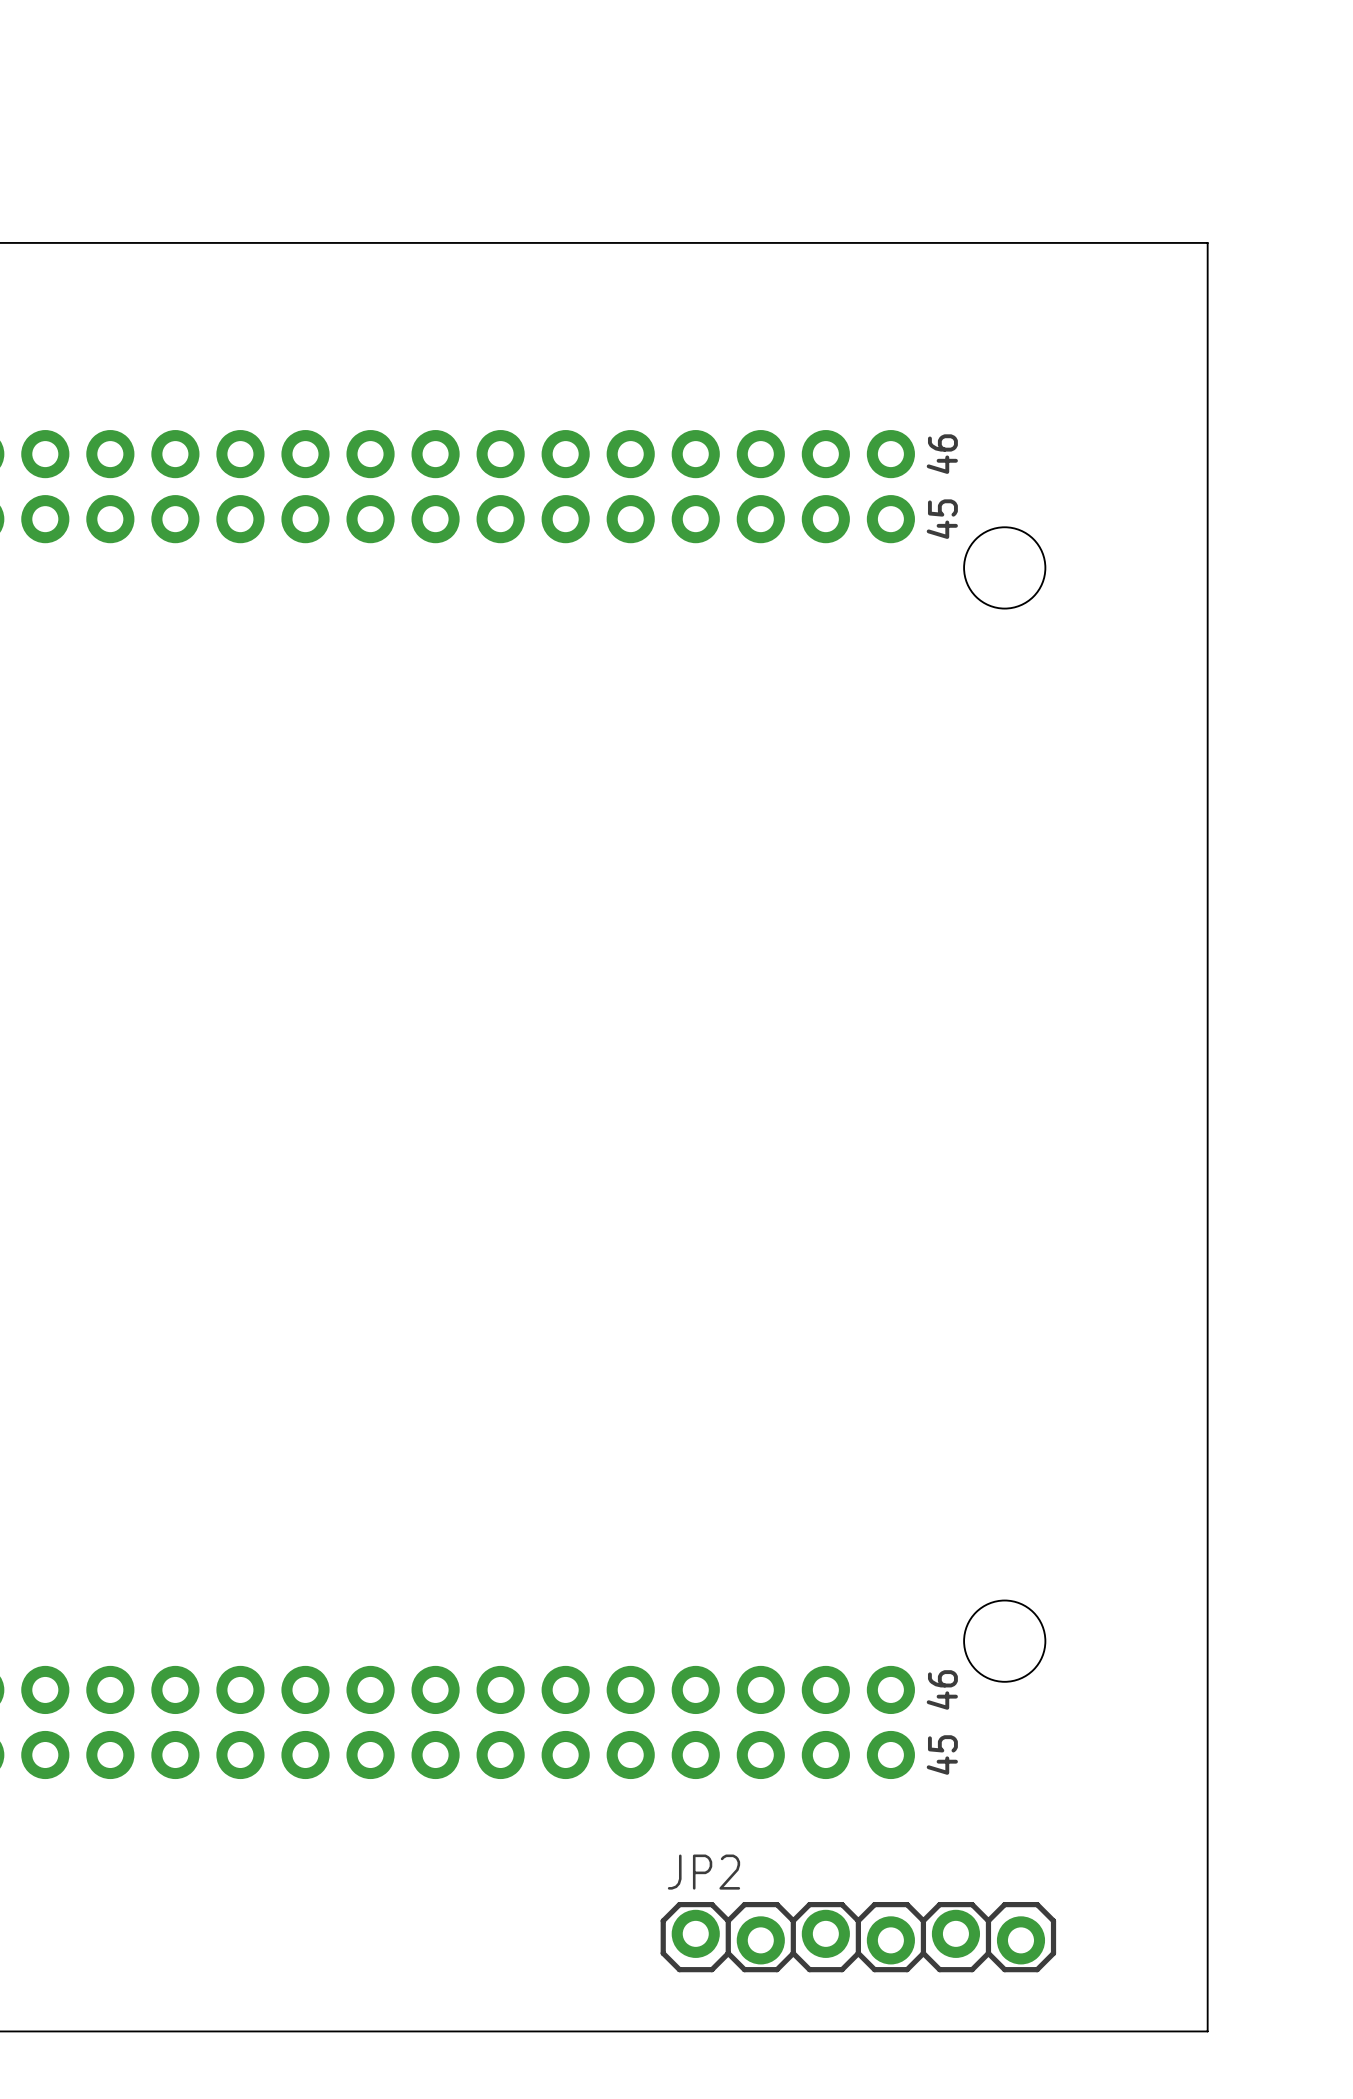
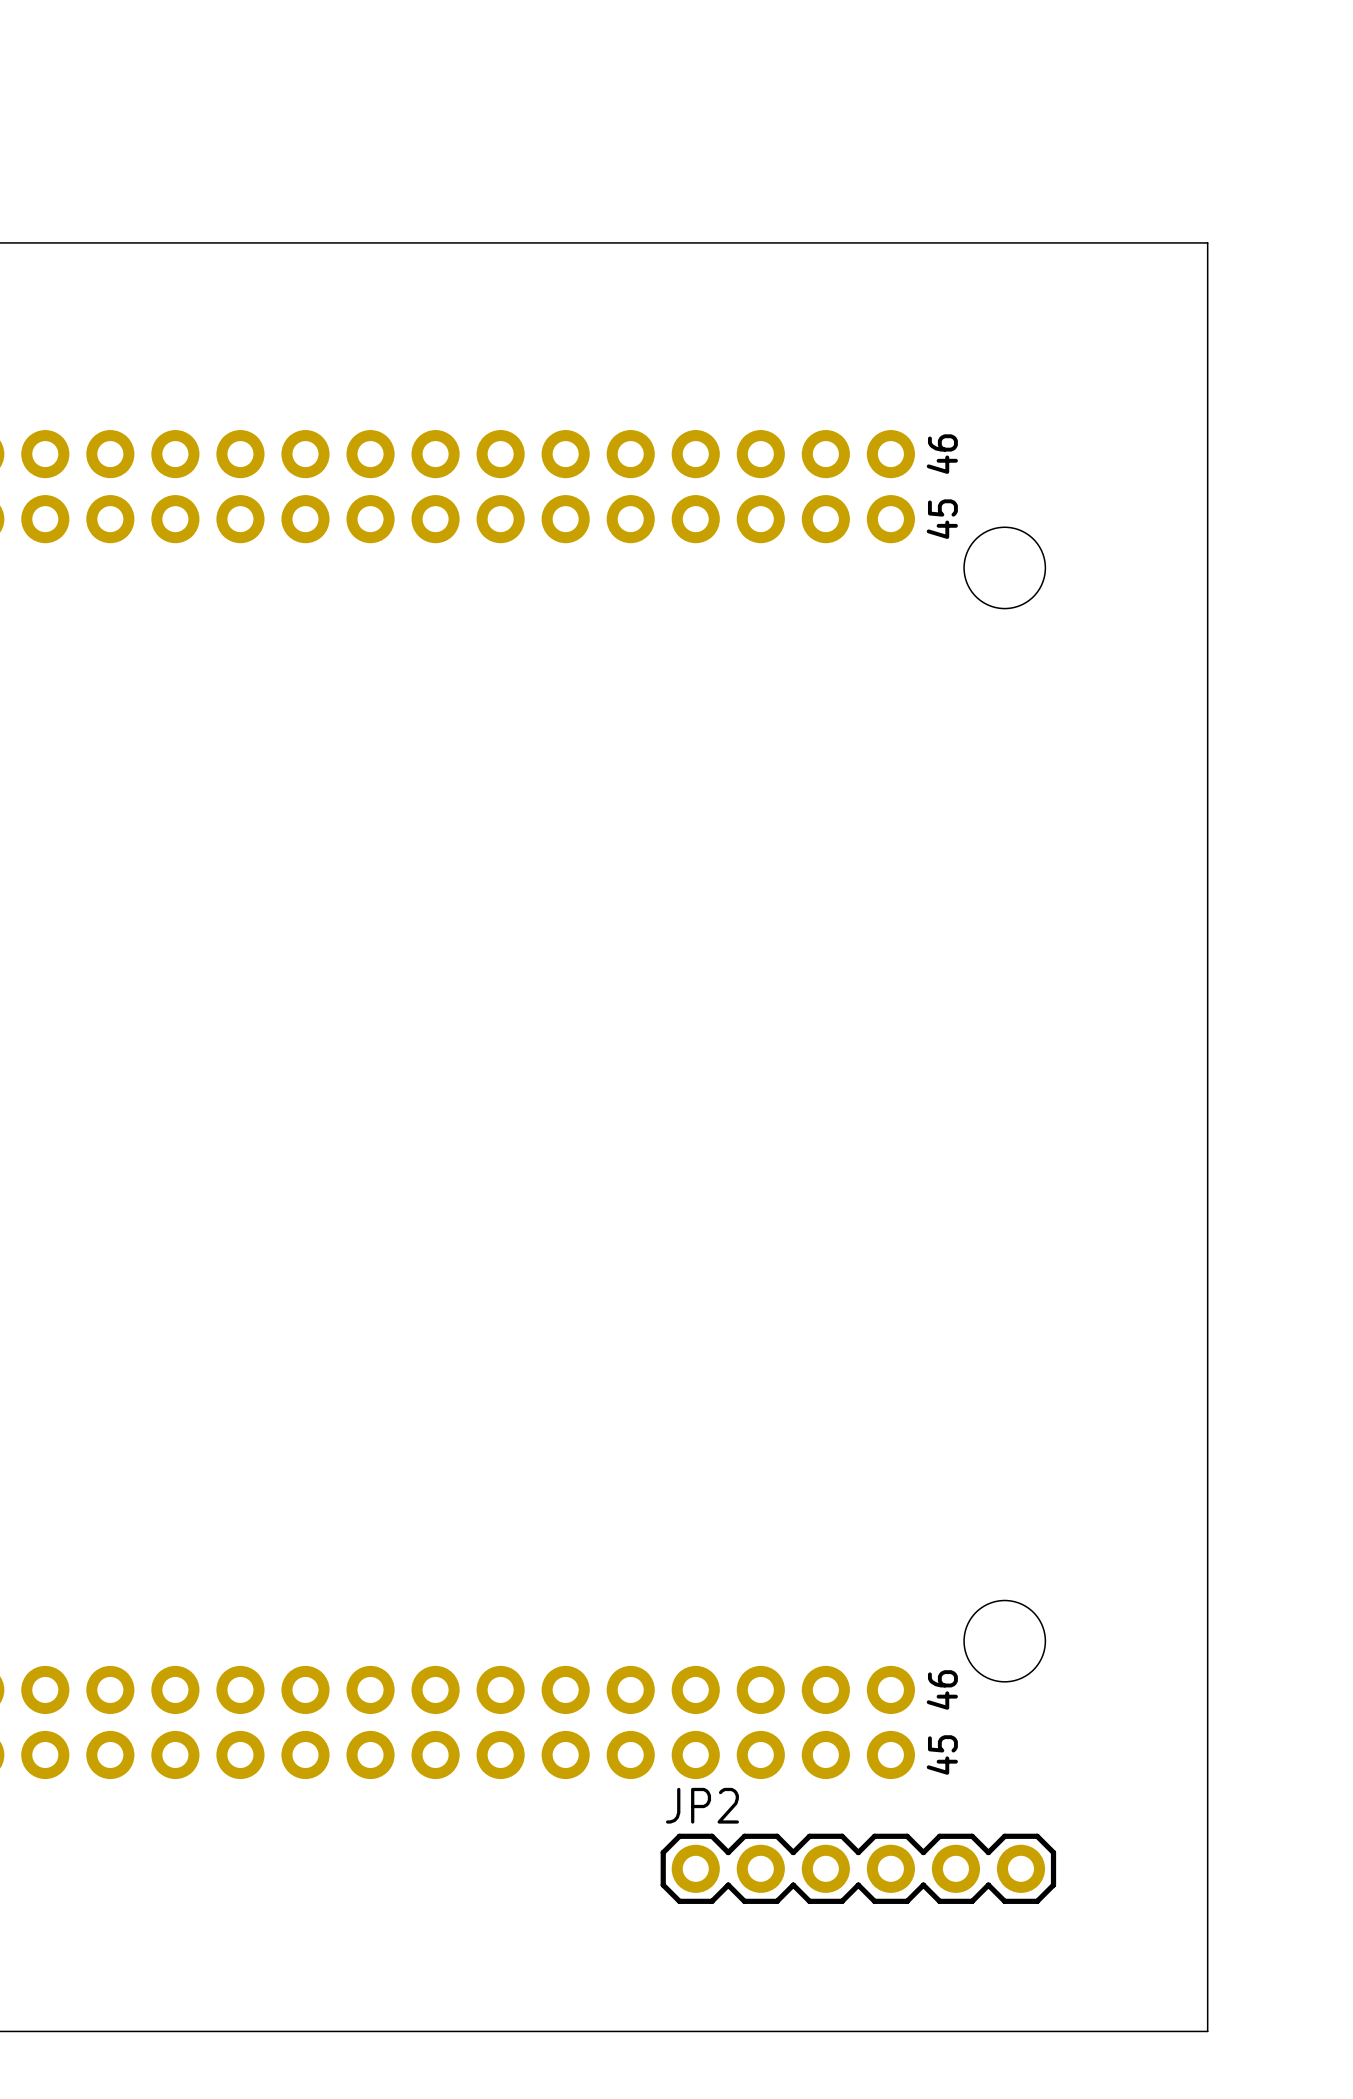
JP2 footprint: [660, 1902, 1057, 1973] -> [660, 1833, 1057, 1904]

